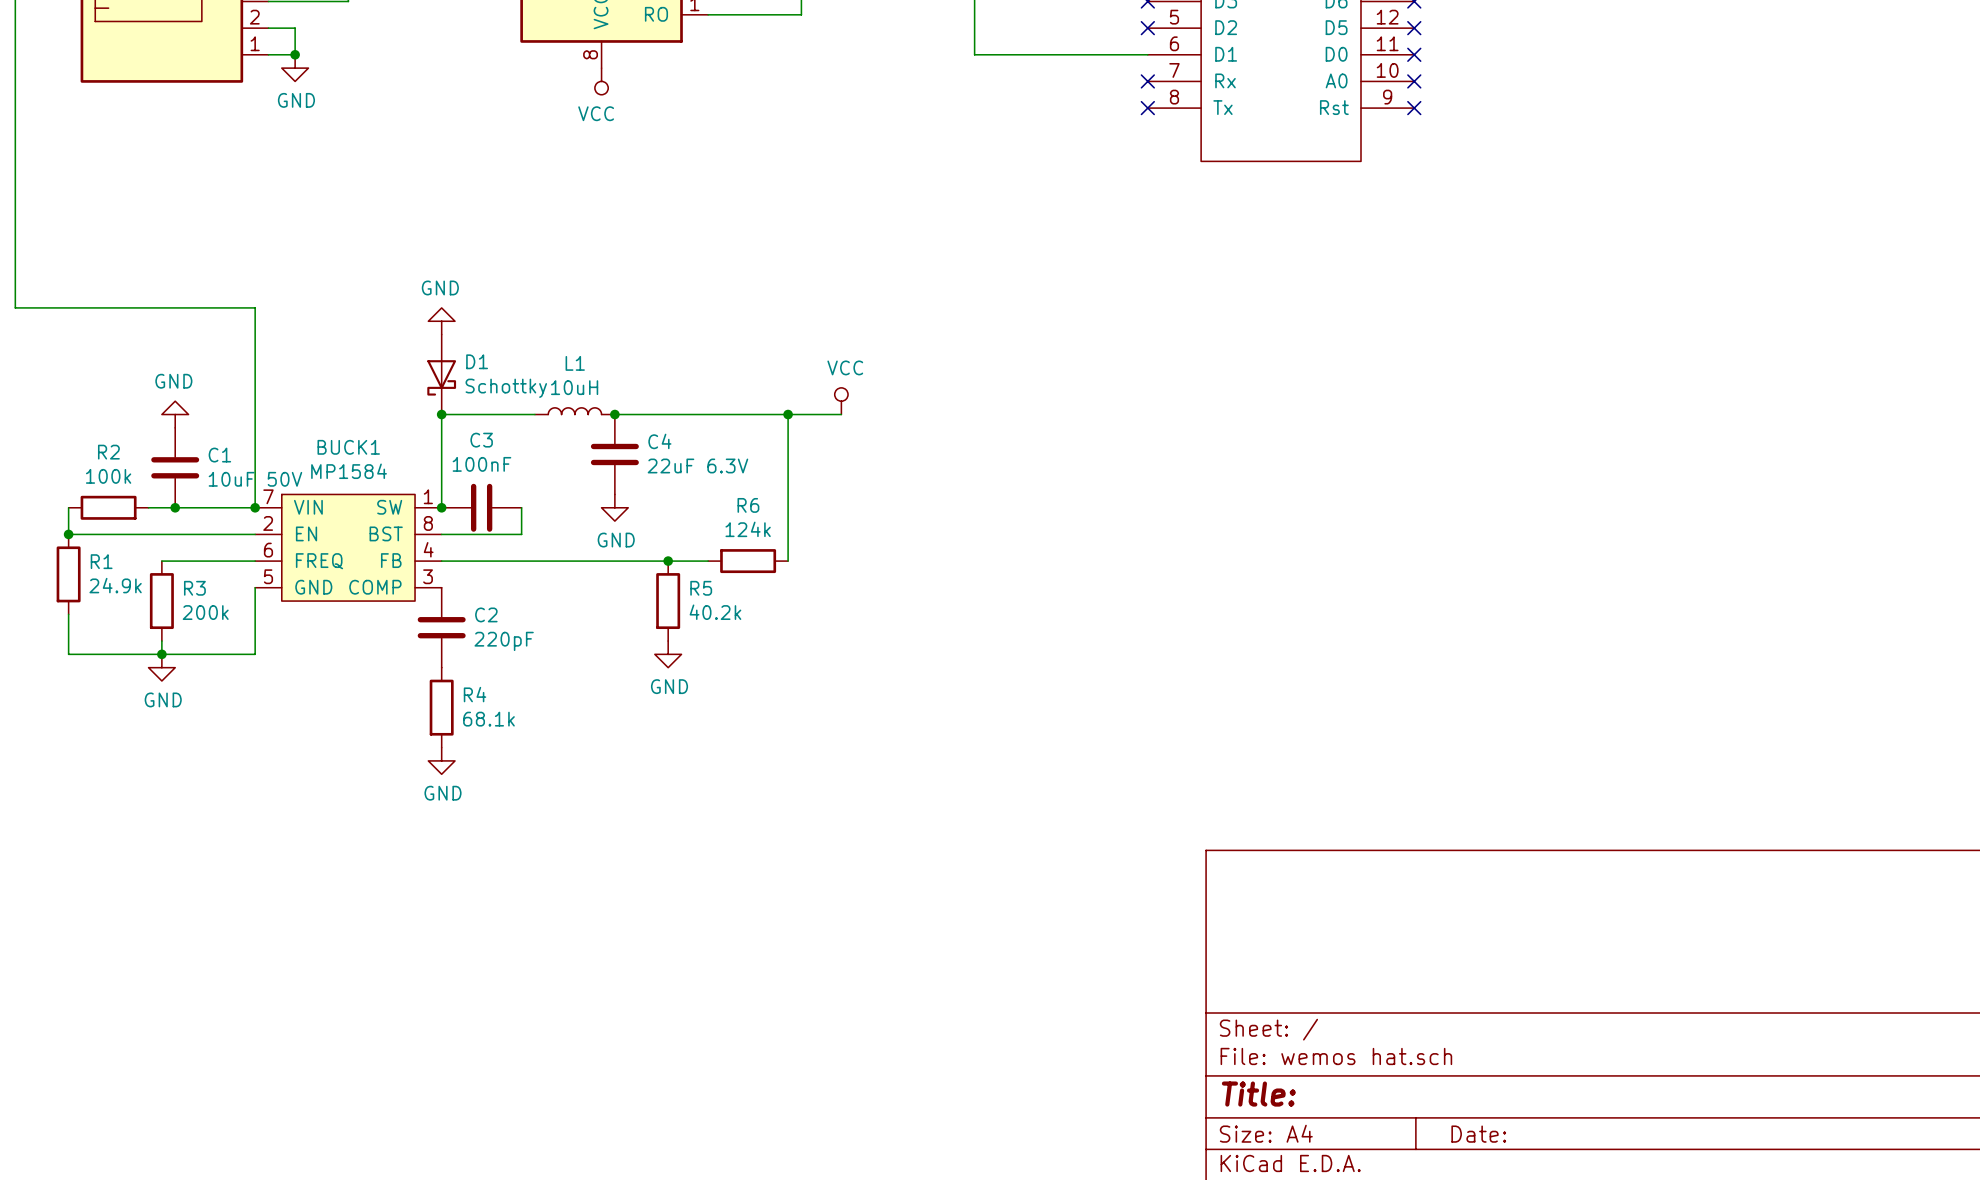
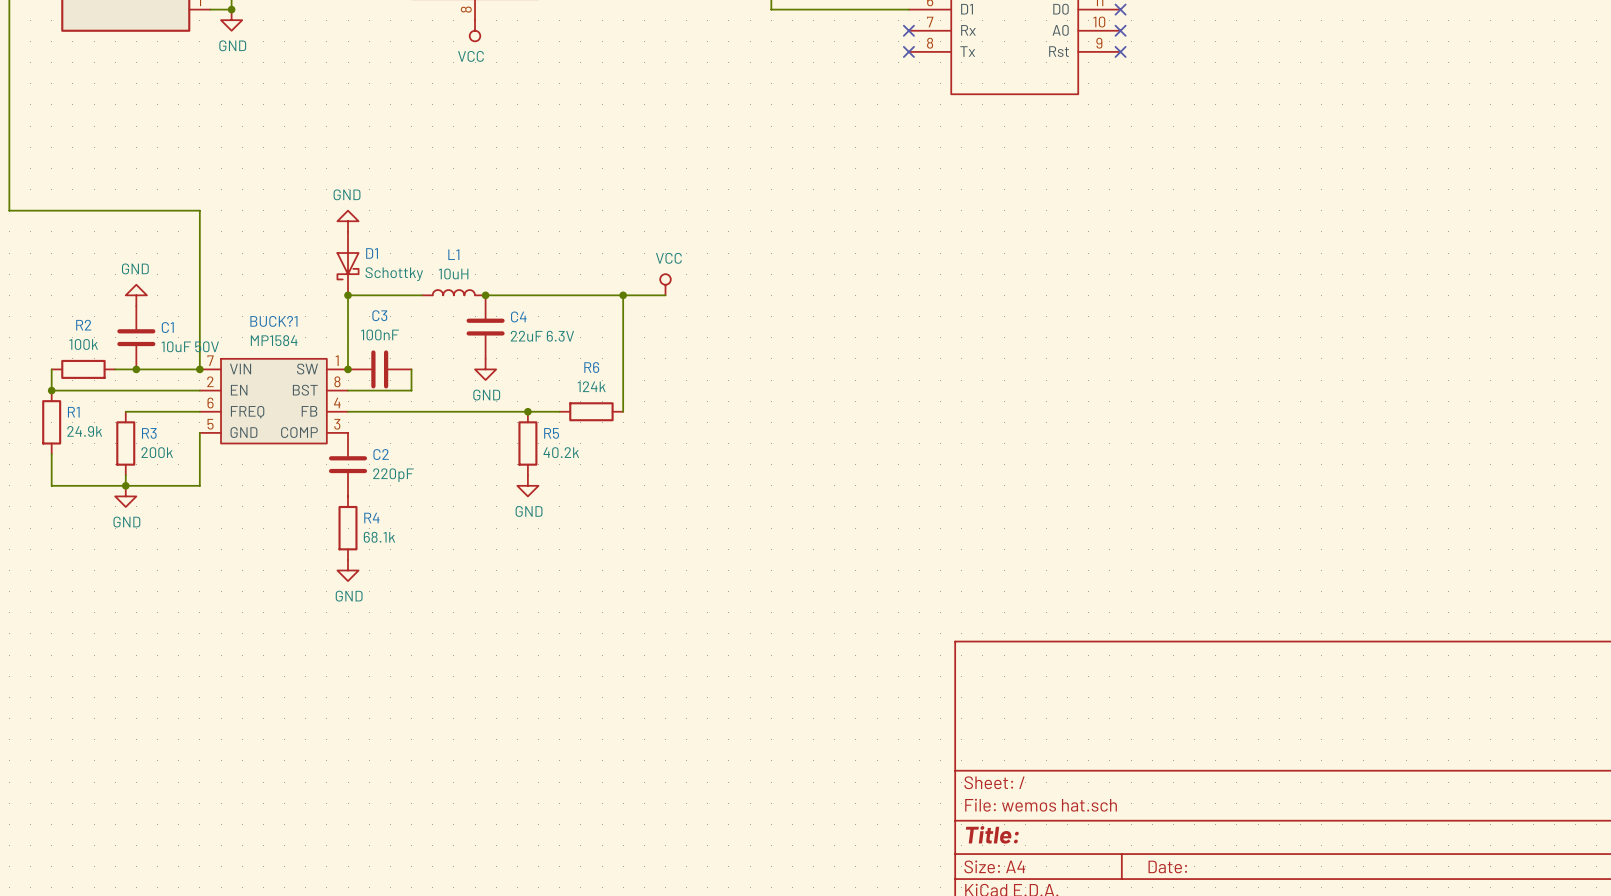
BUCK1 name: BUCK1 (348, 447) -> BUCK?1 (273, 321)

